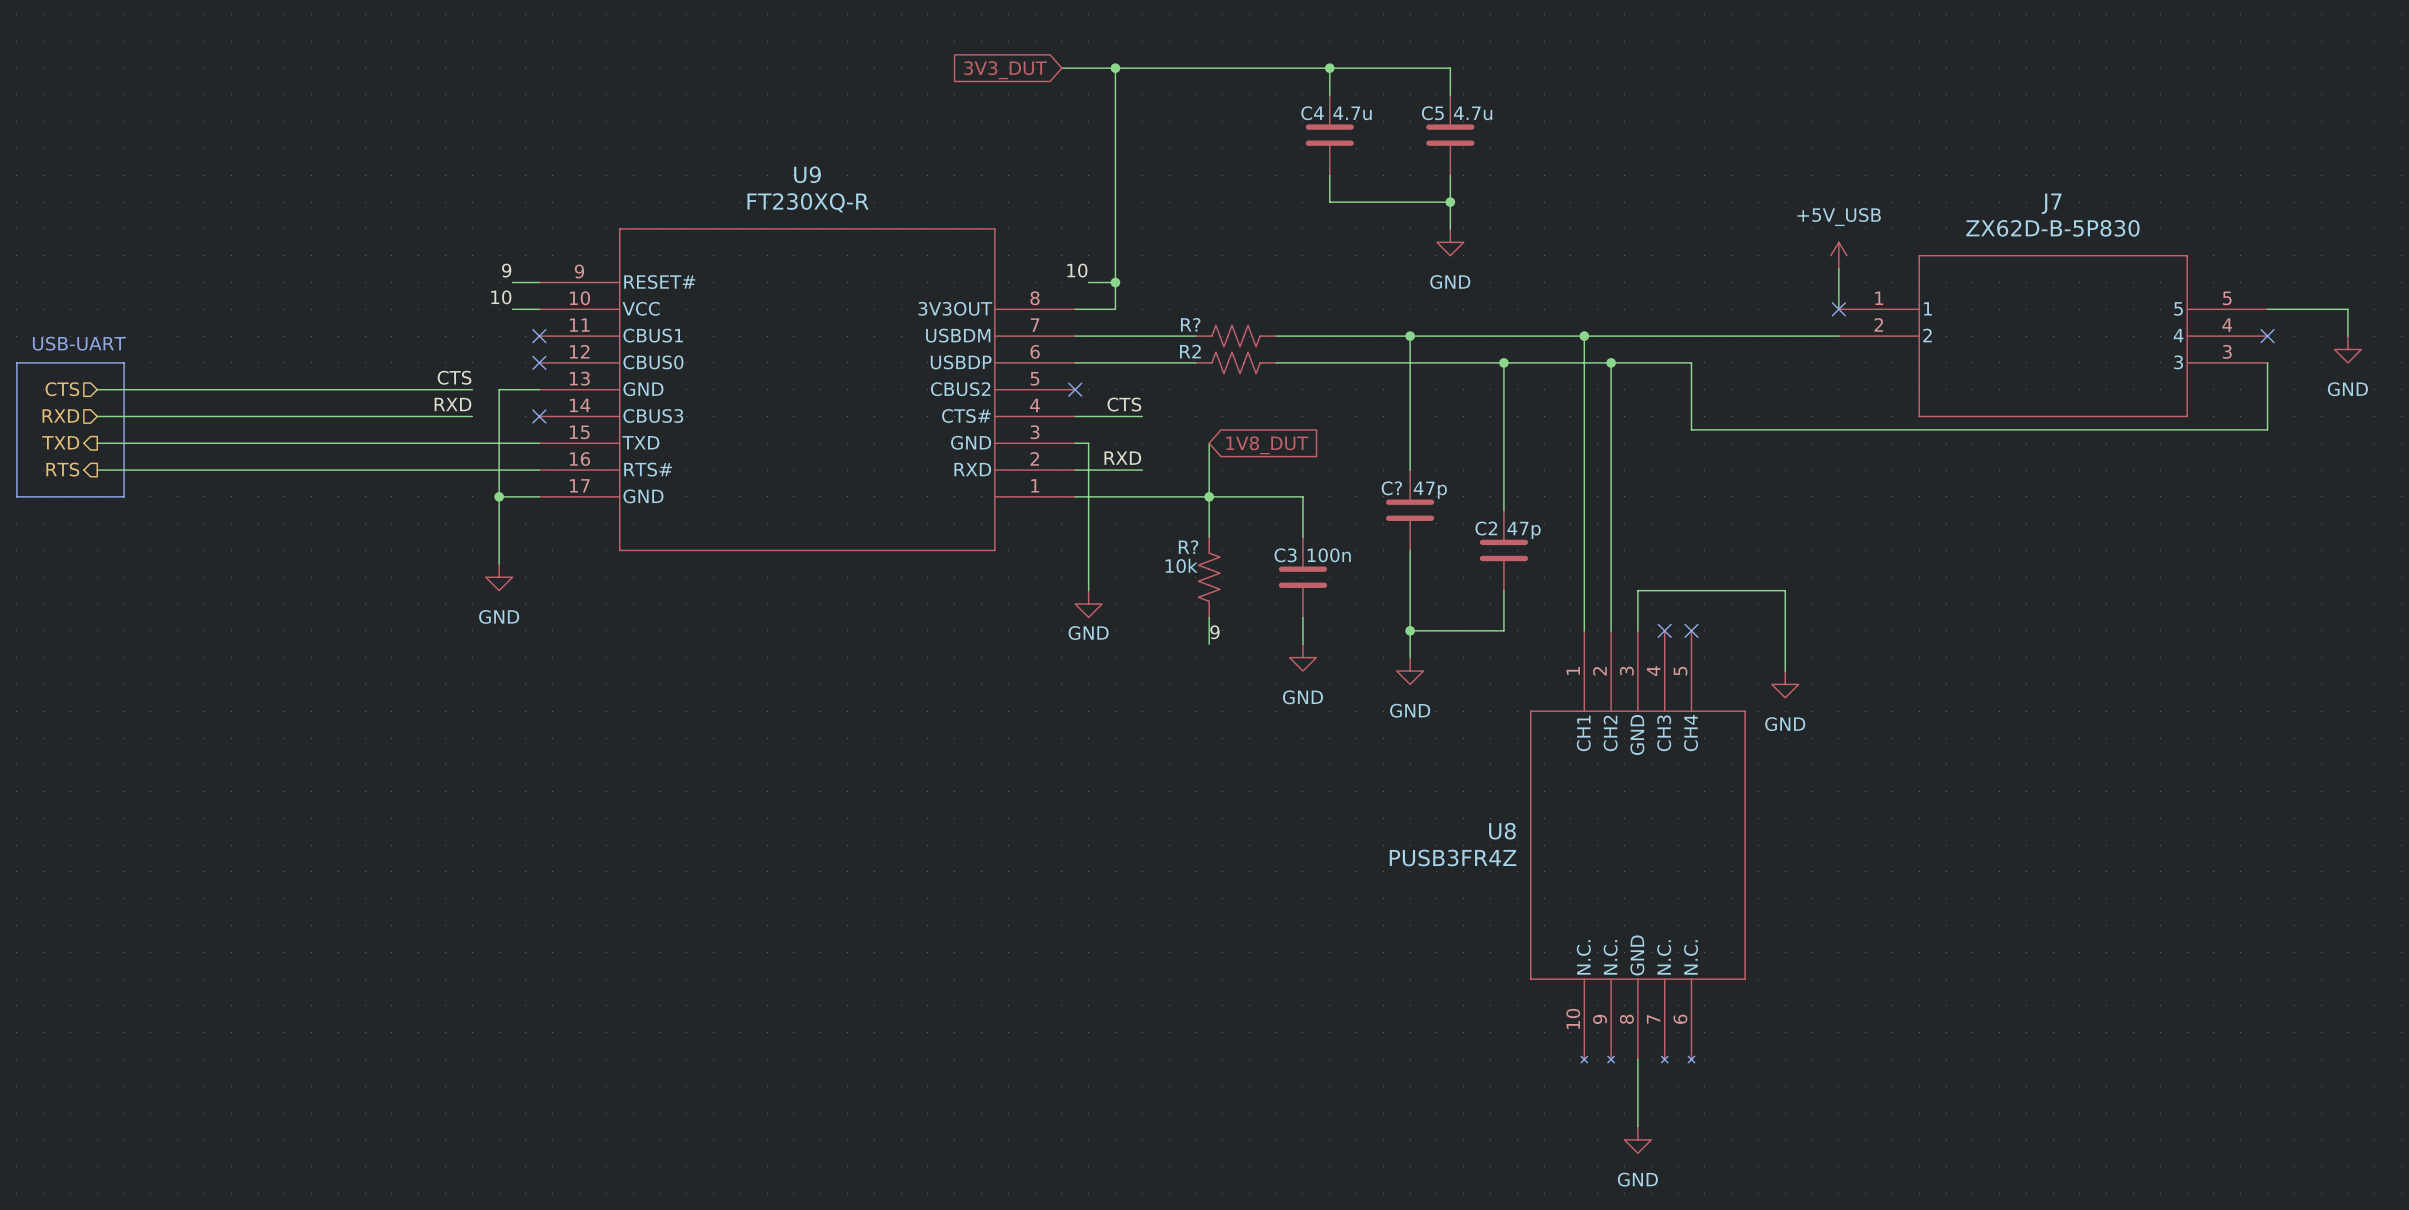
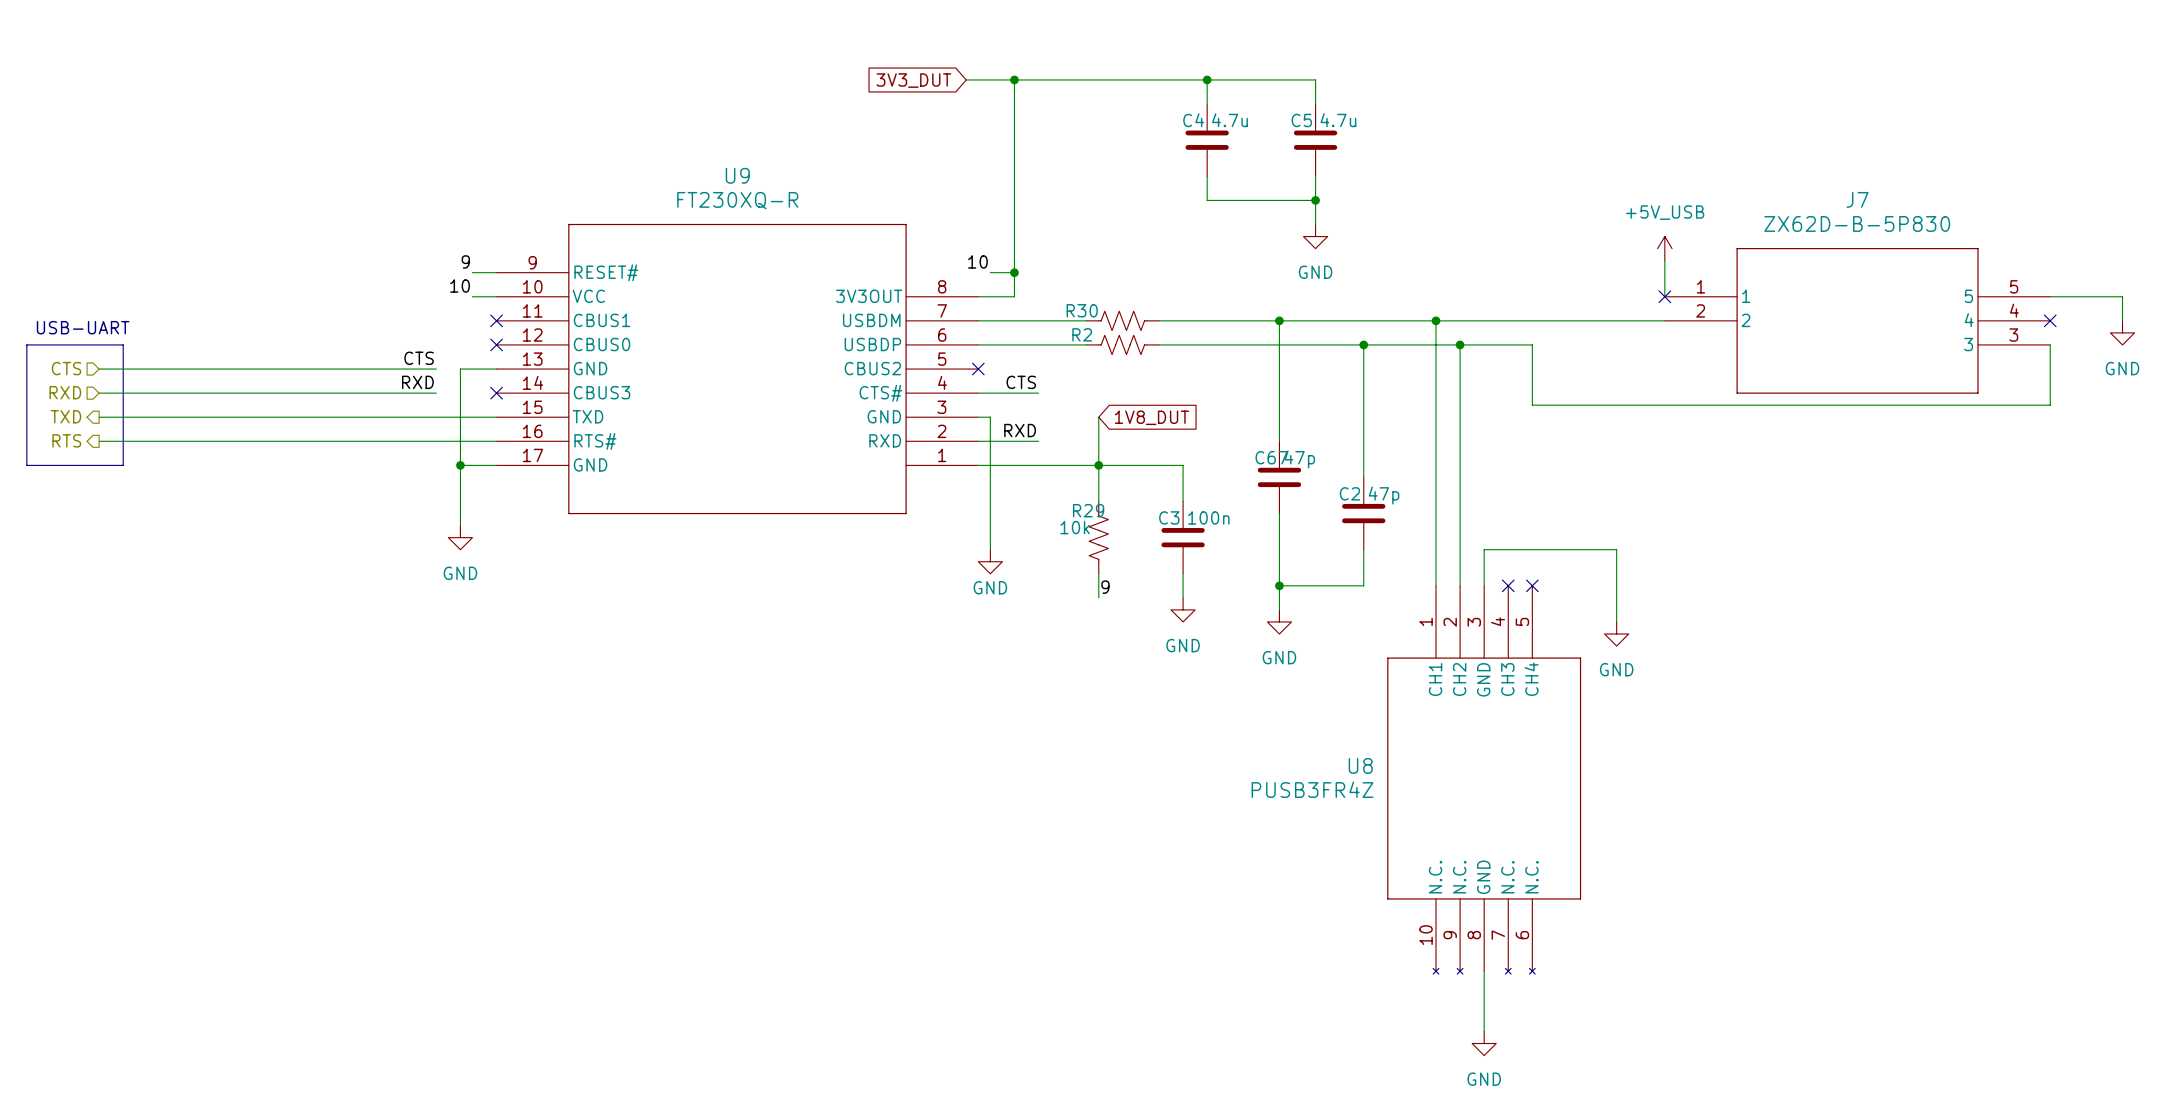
R? name: R? (1190, 324) -> R30 (1082, 310)
C? name: C? (1391, 488) -> C67 (1271, 457)
R? name: R? (1188, 547) -> R29 (1088, 510)

